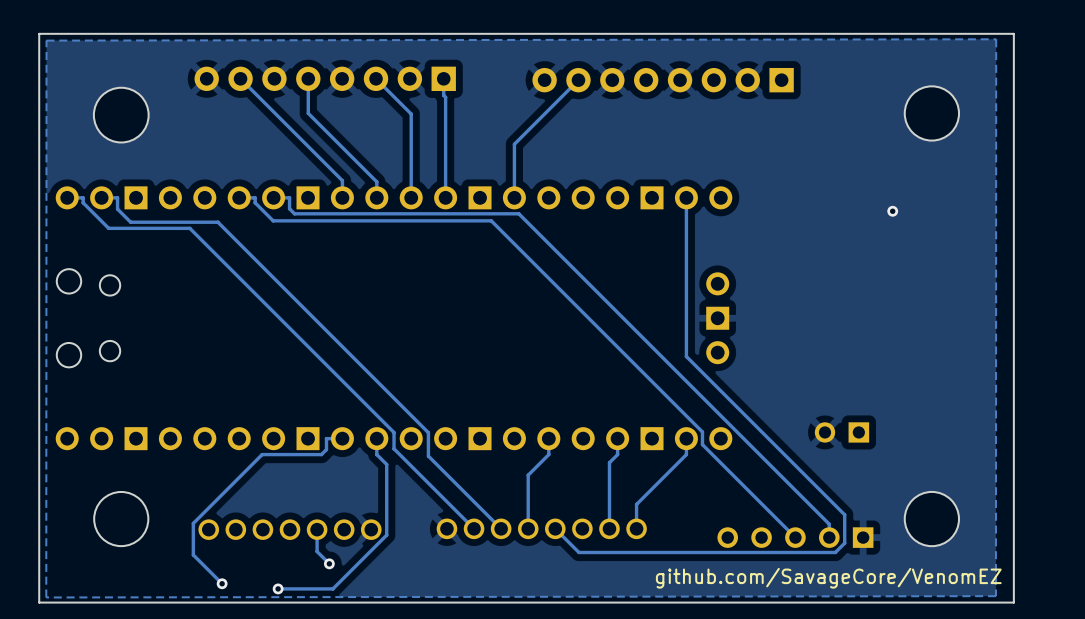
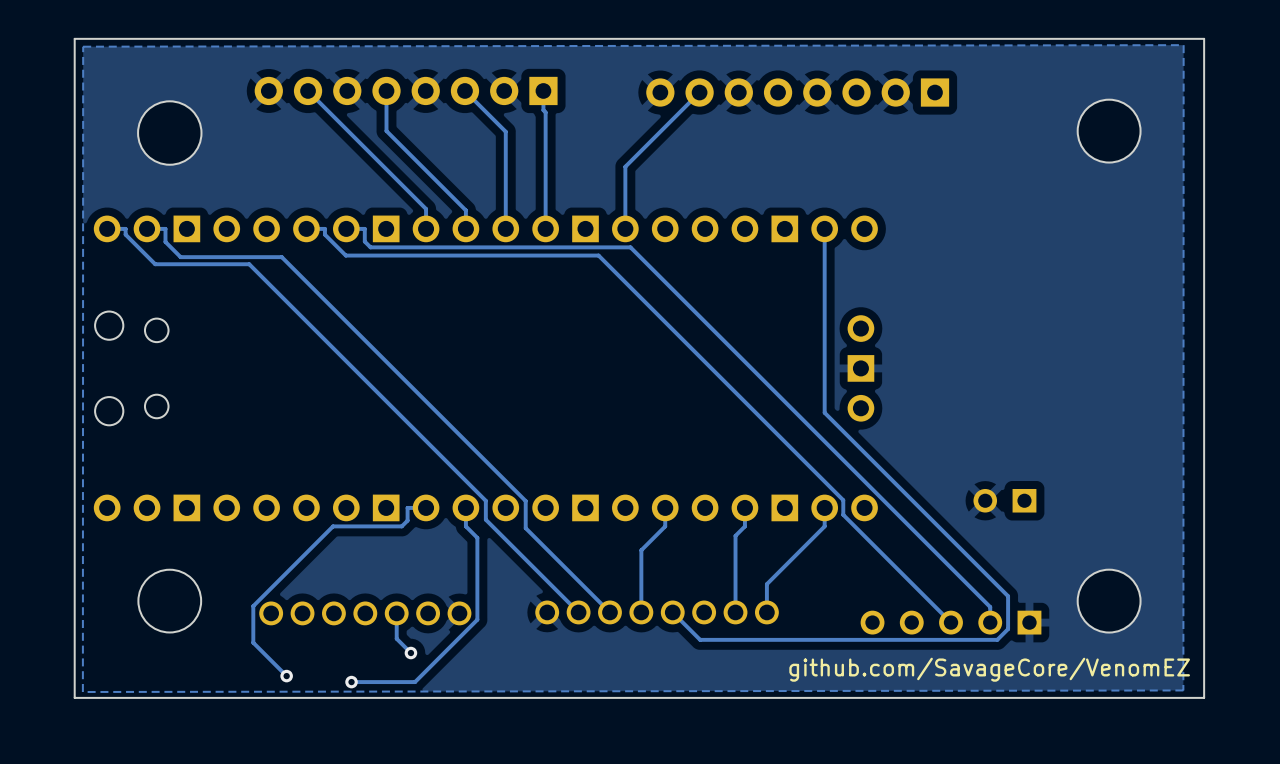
via: (892, 211) -> none

